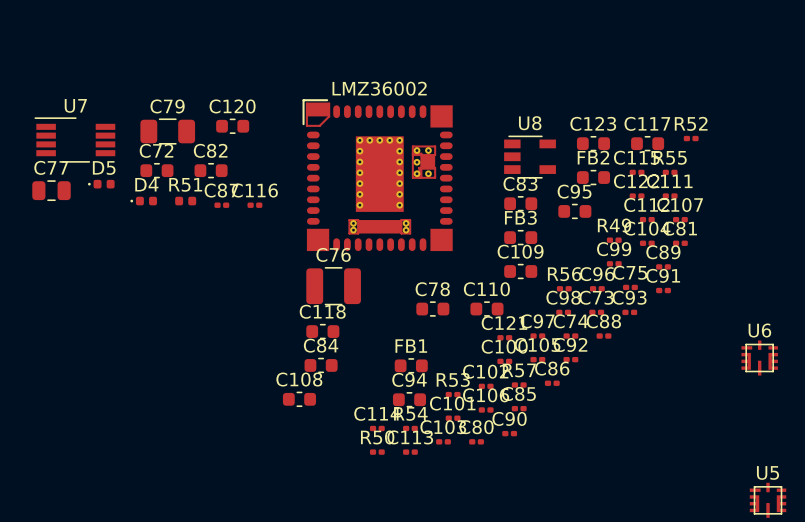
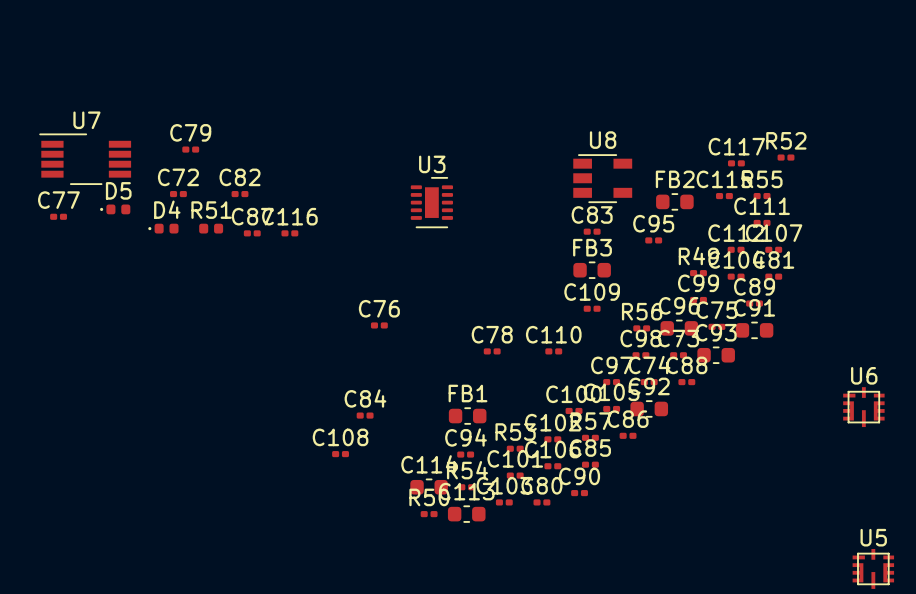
C79 footprint: [140, 118, 196, 145] -> [182, 146, 200, 153]
C120: (232, 126) -> none
C117 footprint: [631, 135, 665, 152] -> [727, 160, 745, 167]
C123: (593, 143) -> none
C72 footprint: [140, 162, 174, 179] -> [170, 191, 187, 198]
C82 footprint: [194, 162, 228, 179] -> [231, 191, 249, 198]
part: LMZ36002 (377, 175) -> none
U3: none -> (431, 202)
C77 footprint: [32, 180, 71, 202] -> [50, 213, 68, 220]
C83 footprint: [504, 196, 538, 212] -> [583, 228, 601, 235]
C122: (637, 196) -> none
C95 footprint: [558, 203, 592, 220] -> [645, 237, 663, 244]
C109 footprint: [504, 263, 538, 280] -> [583, 305, 601, 312]
C76 footprint: [306, 267, 361, 306] -> [370, 322, 388, 329]
C96 footprint: [589, 286, 605, 292] -> [660, 319, 699, 338]
C91 footprint: [656, 287, 671, 294] -> [735, 321, 774, 340]
C78 footprint: [416, 301, 450, 317] -> [483, 348, 501, 355]
C110 footprint: [470, 301, 504, 317] -> [545, 348, 563, 355]
C93 footprint: [622, 309, 638, 316] -> [697, 346, 735, 364]
C118: (322, 331) -> none
C121: (504, 337) -> none
C92 footprint: [563, 356, 579, 363] -> [630, 400, 669, 418]
C84 footprint: [304, 357, 338, 374] -> [356, 412, 374, 419]
C108 footprint: [282, 391, 317, 408] -> [332, 451, 349, 458]
C94 footprint: [392, 392, 427, 408] -> [457, 451, 475, 458]
C114 footprint: [369, 425, 385, 432] -> [410, 478, 448, 497]
C113 footprint: [403, 449, 418, 455] -> [447, 505, 486, 523]

